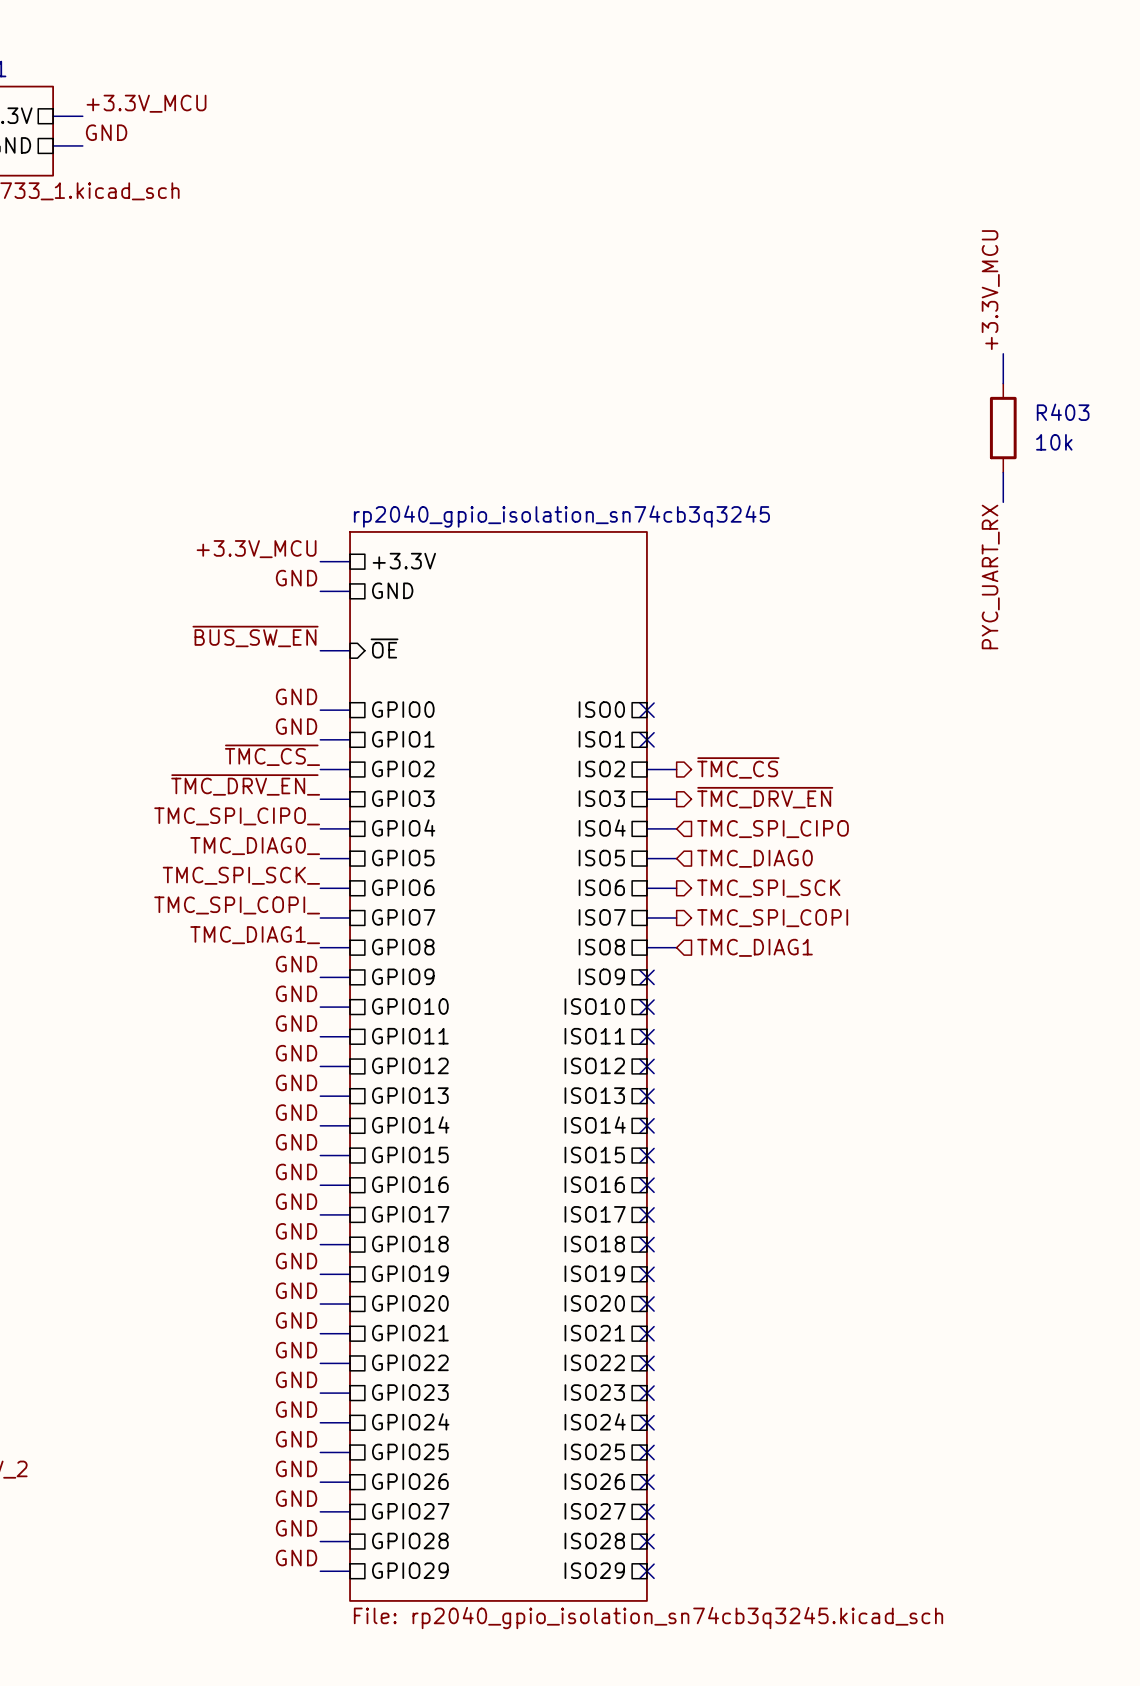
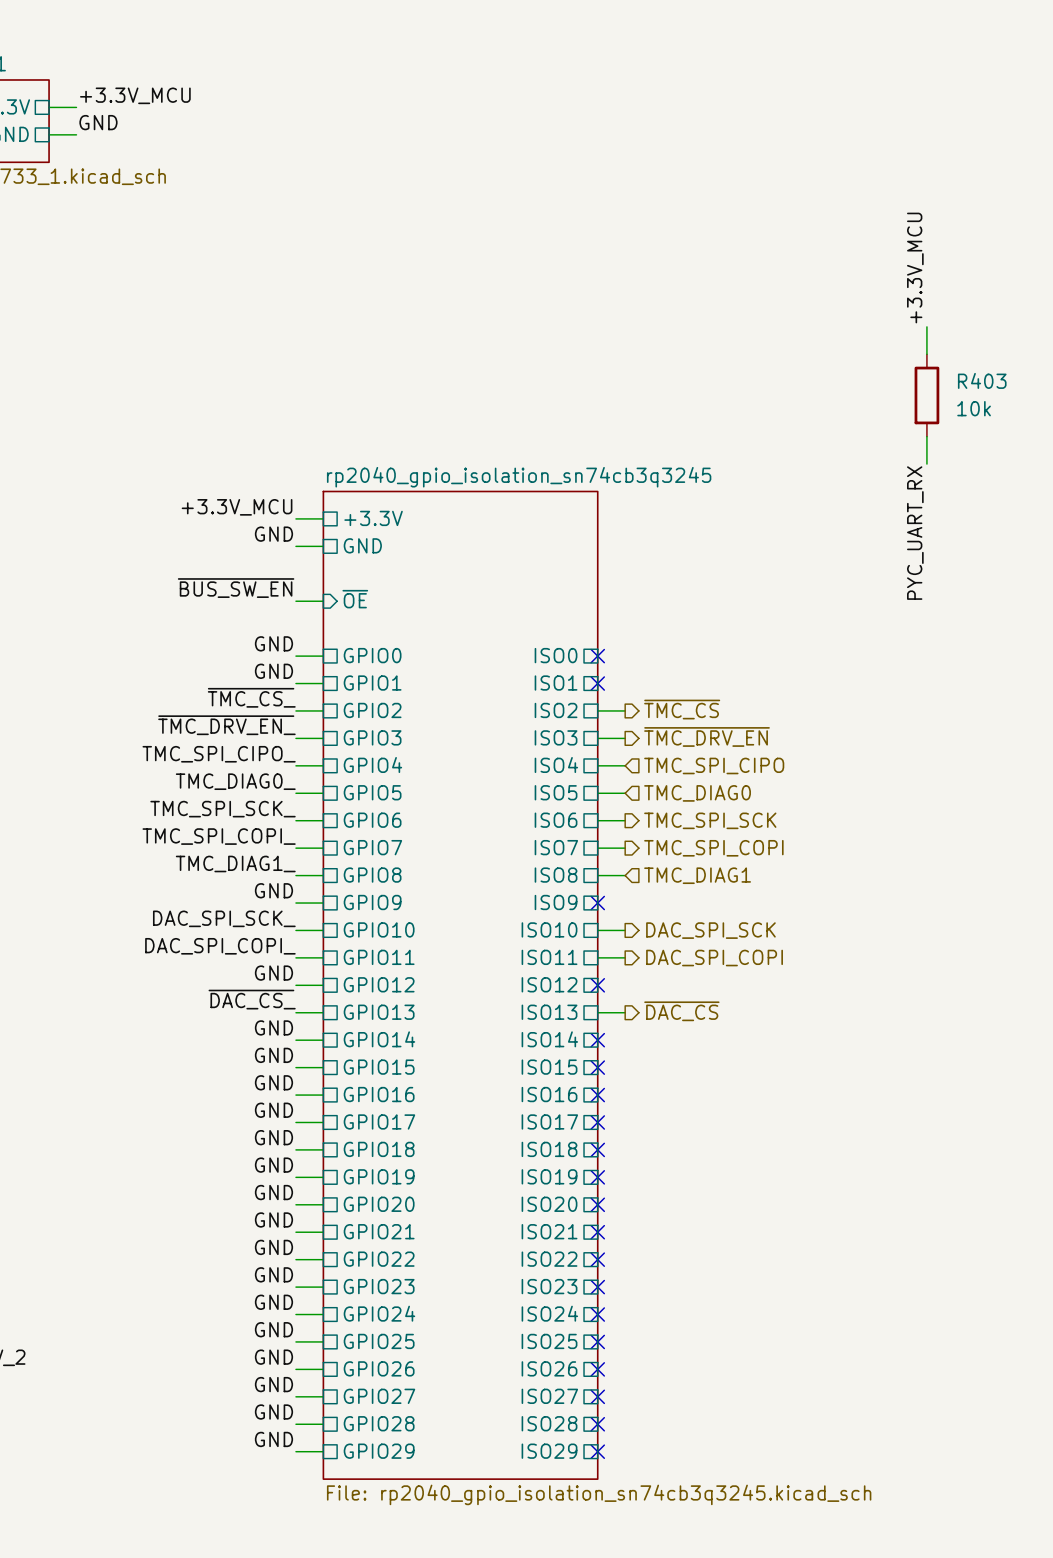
label: GND (296, 993) -> DAC_SPI_SCK_ (224, 918)
wire: none -> (597, 930) (625, 930)
no-connect mark: (646, 1007) -> none
hierarchical label: none -> DAC_SPI_SCK (710, 930)
label: GND (296, 1023) -> DAC_SPI_COPI_ (220, 946)
wire: none -> (597, 957) (625, 957)
no-connect mark: (646, 1036) -> none
hierarchical label: none -> DAC_SPI_COPI (714, 958)
label: GND (296, 1082) -> ~{DAC_CS_} (252, 999)
hierarchical label: none -> ~{DAC_CS} (681, 1011)
wire: none -> (597, 1012) (625, 1012)
no-connect mark: (646, 1096) -> none

